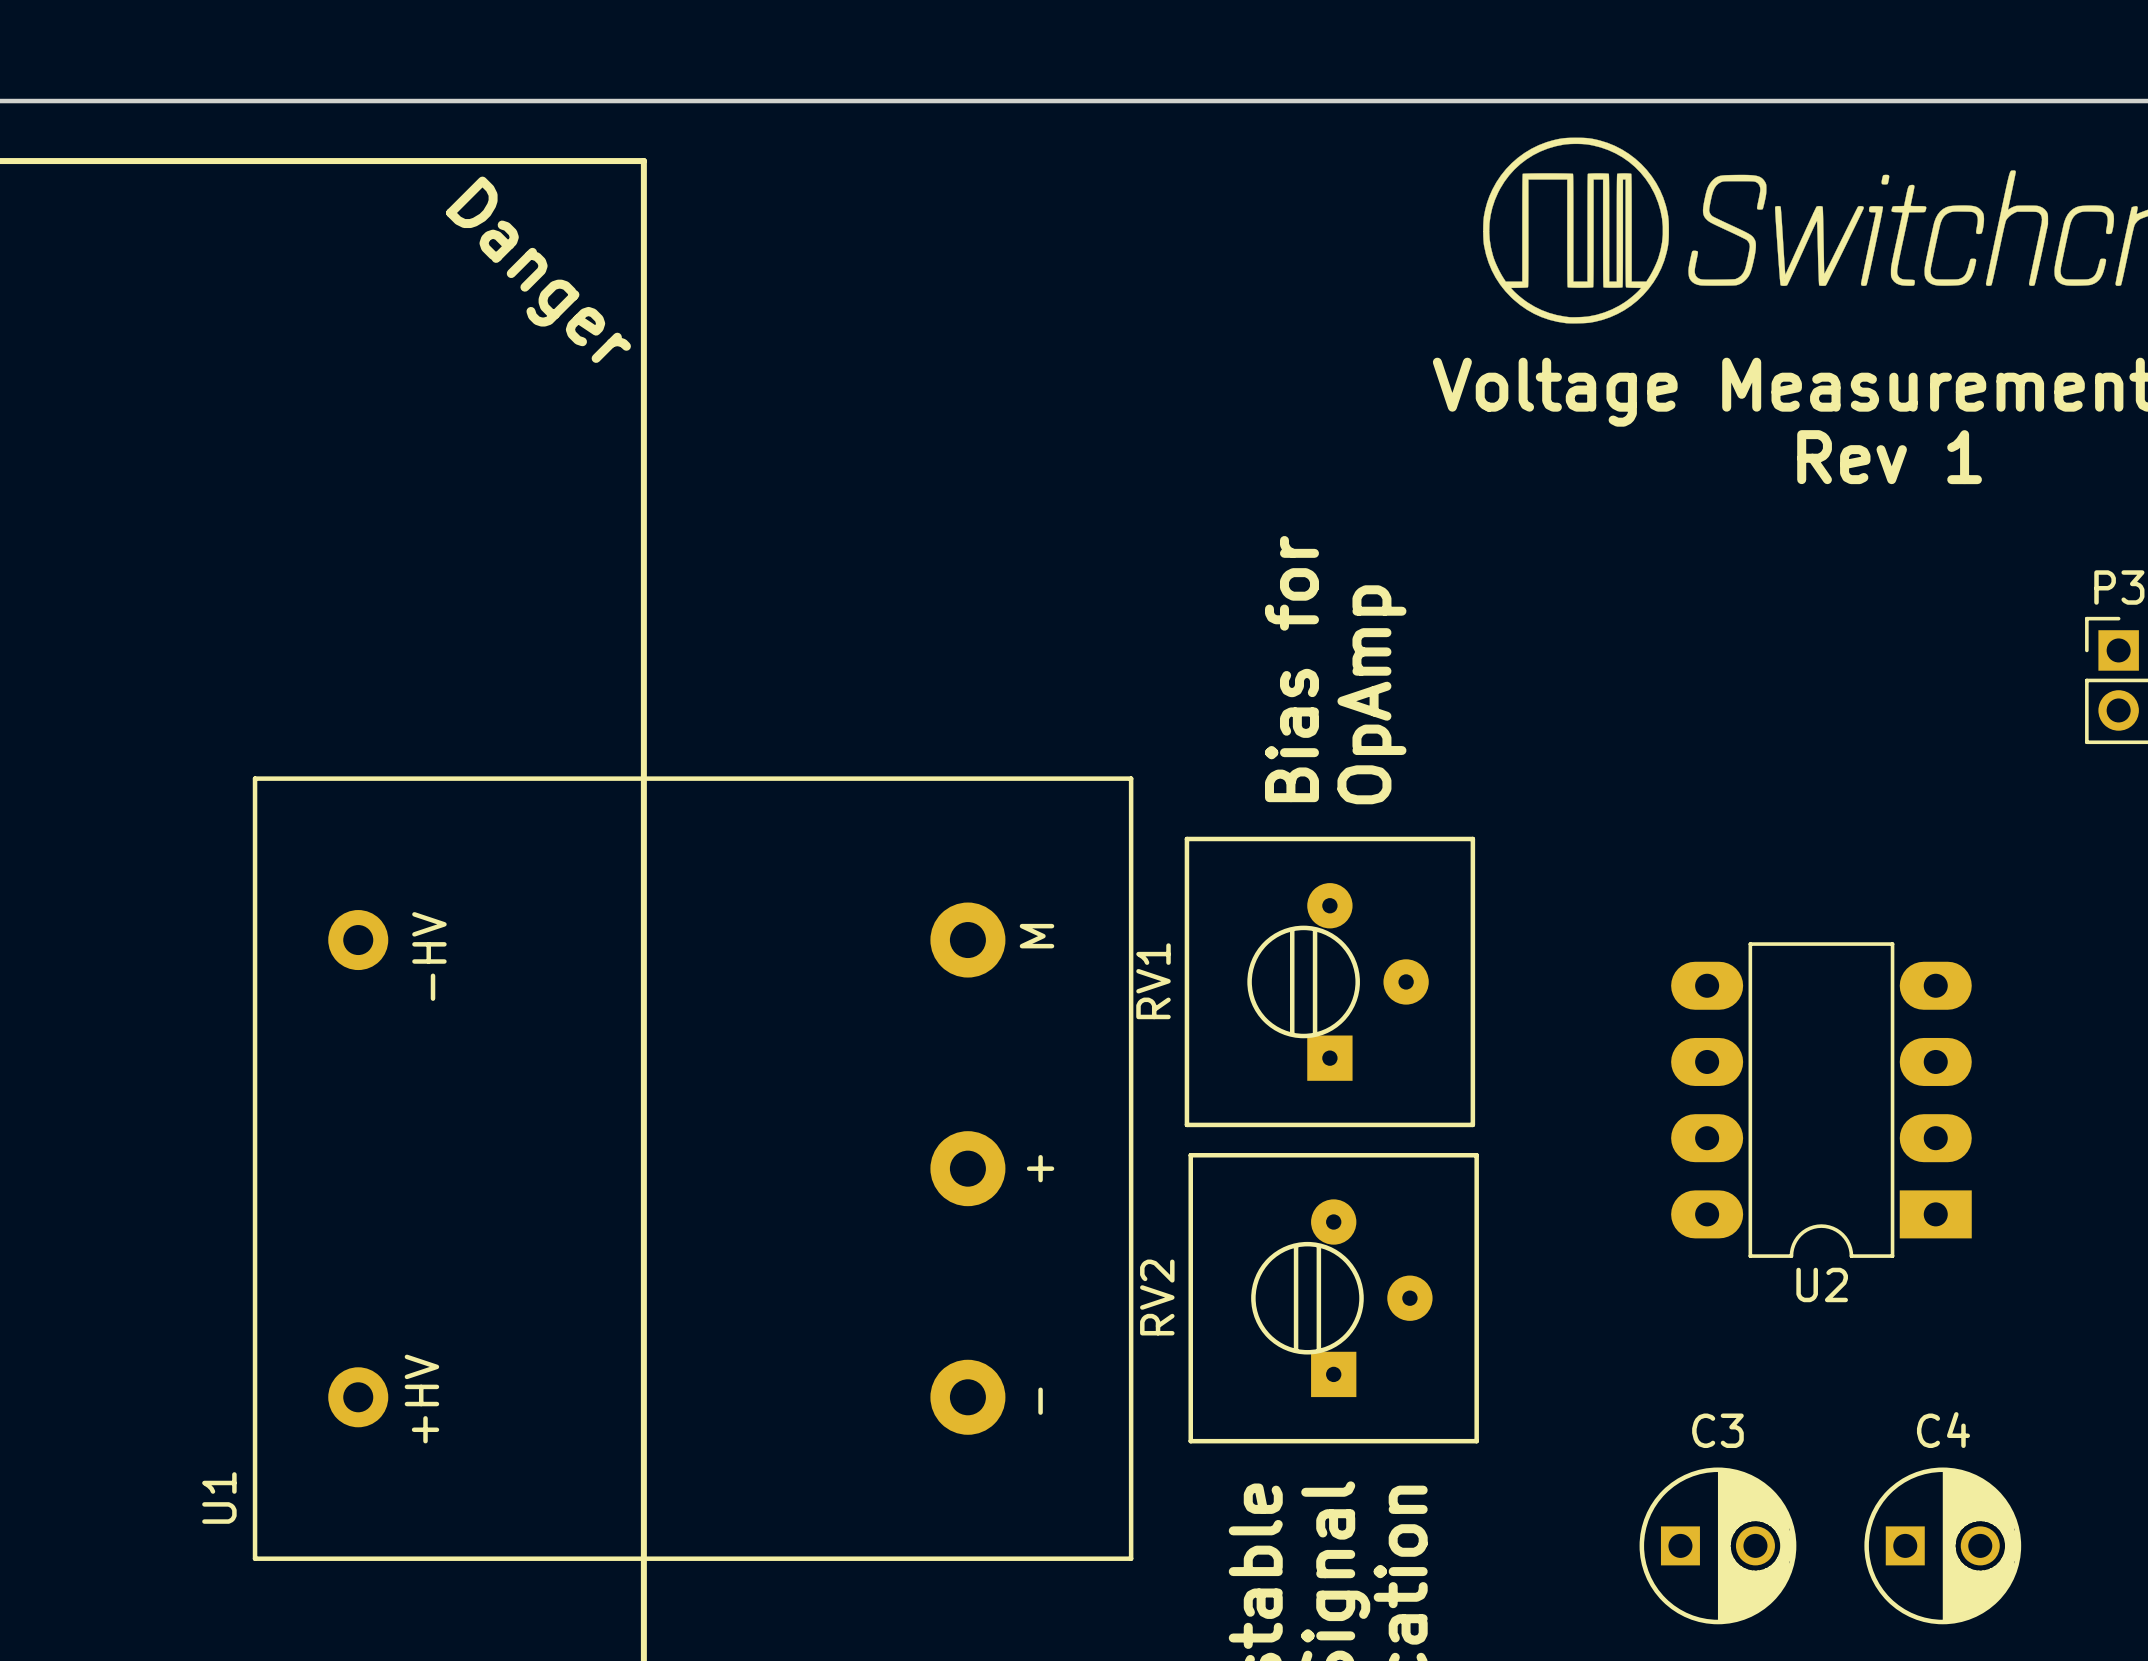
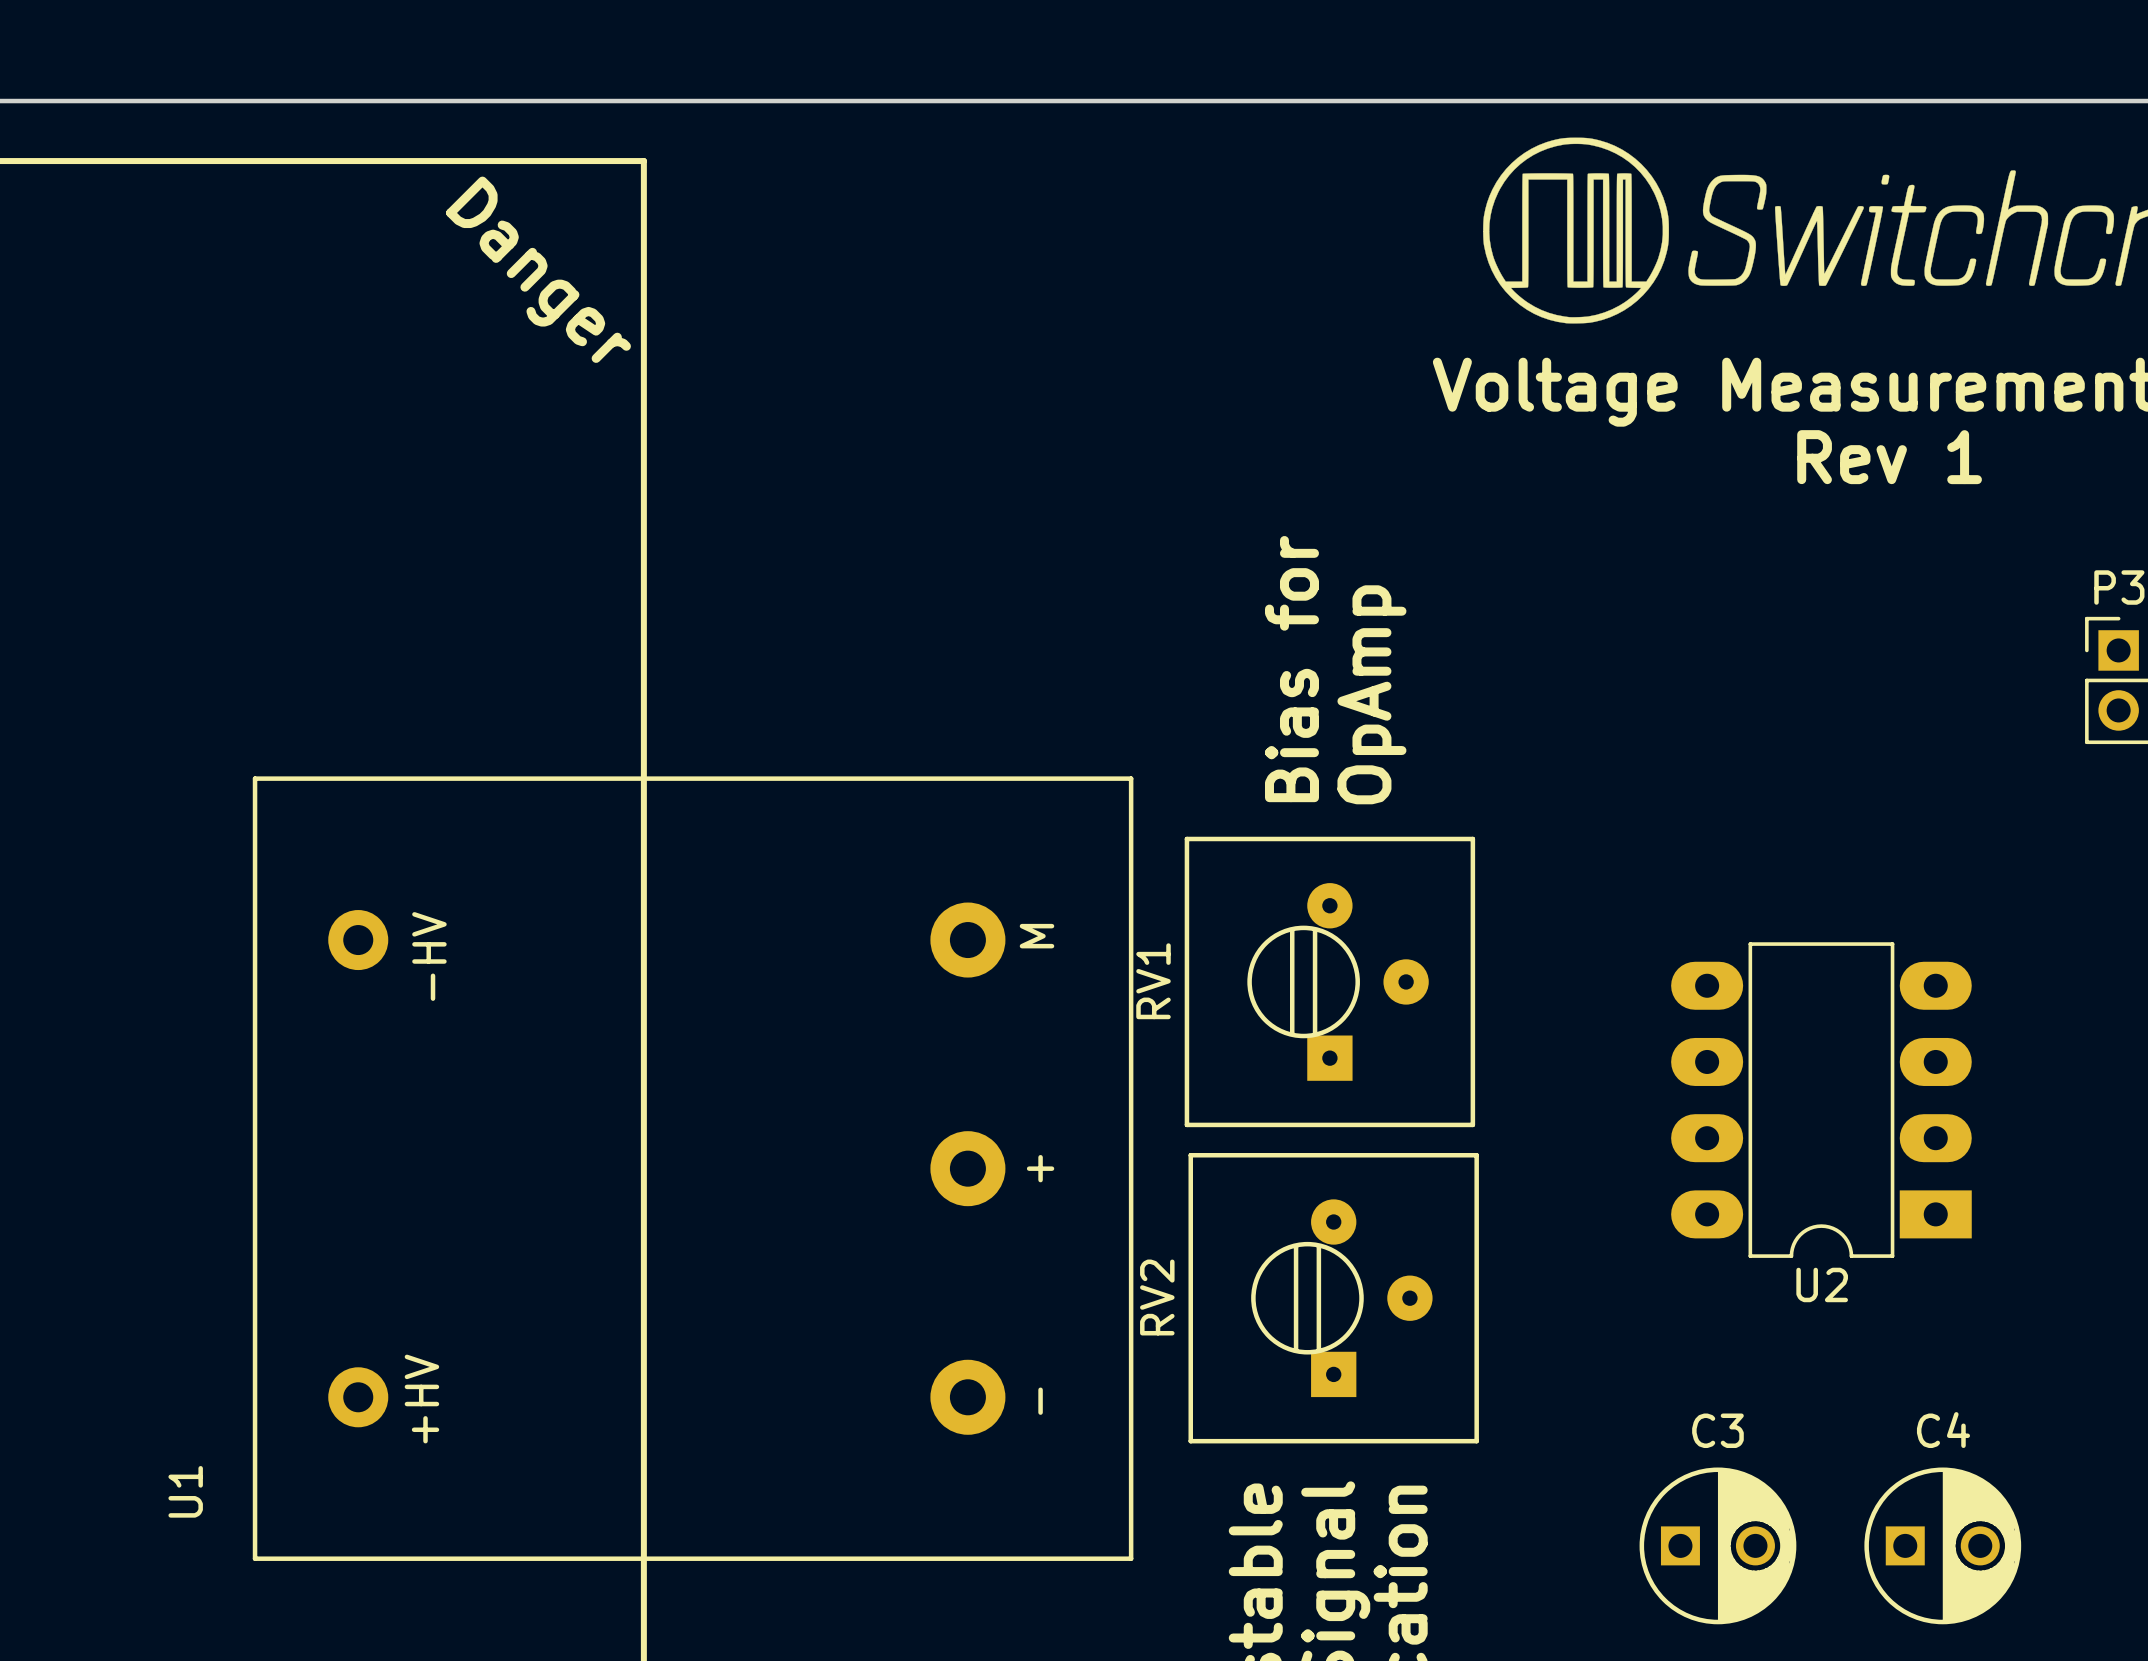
U1 name position: U1 (219, 1497) -> U1 (185, 1491)

